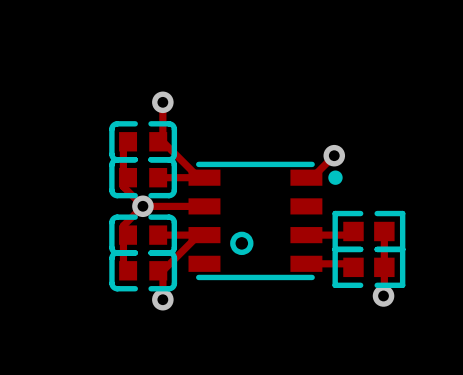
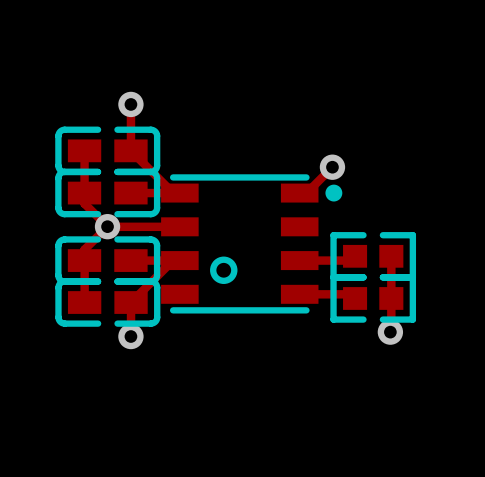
part footprint: [109, 121, 178, 163] -> [55, 126, 161, 176]
part footprint: [109, 157, 178, 199] -> [55, 168, 161, 218]
part footprint: [109, 214, 178, 256] -> [55, 236, 161, 285]
part footprint: [109, 250, 178, 292] -> [55, 278, 161, 327]

